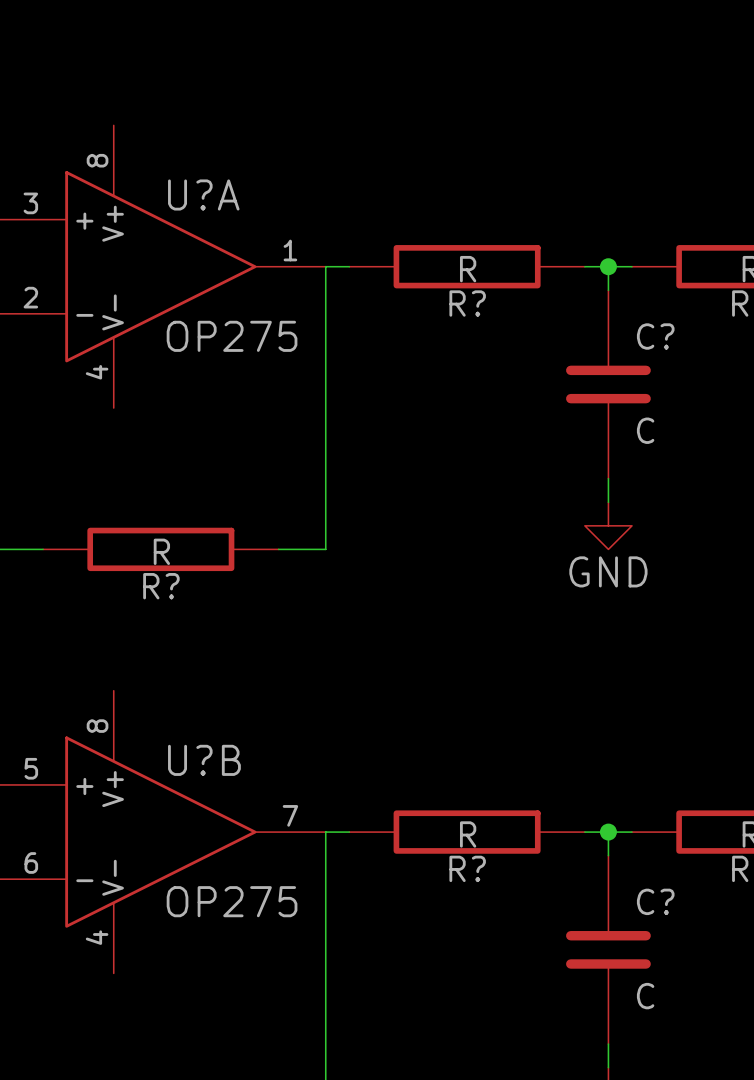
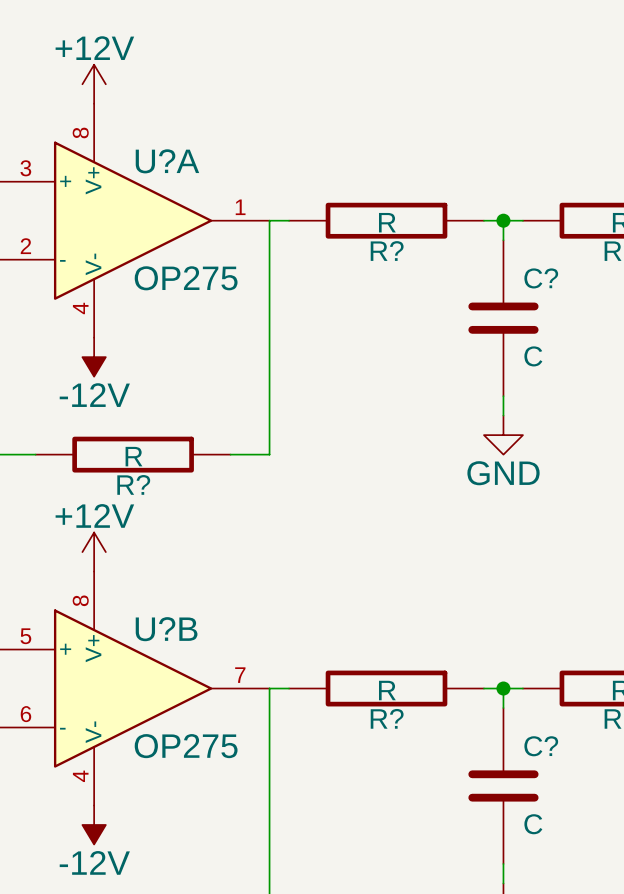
power symbol: none -> +12V (94, 84)
power symbol: none -> -12V (94, 357)
power symbol: none -> +12V (94, 552)
power symbol: none -> -12V (94, 824)

